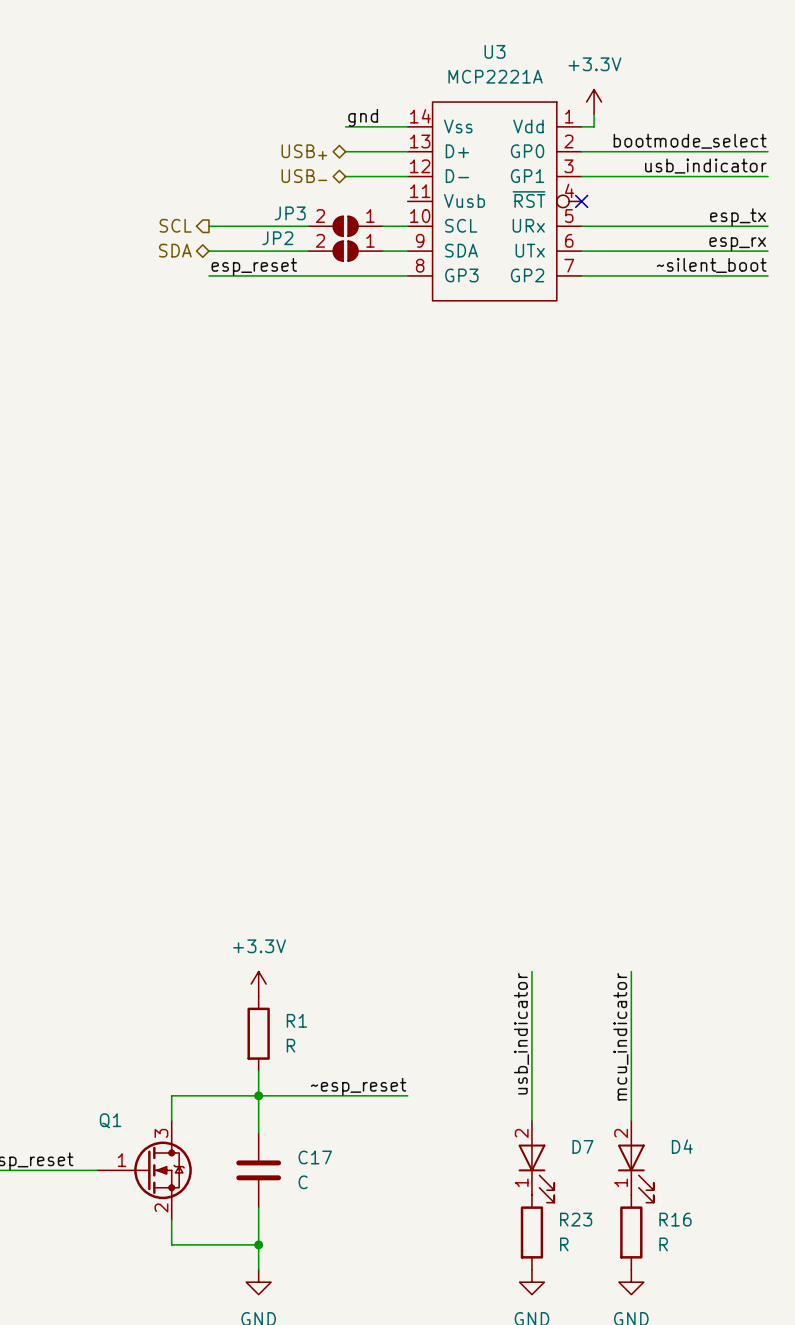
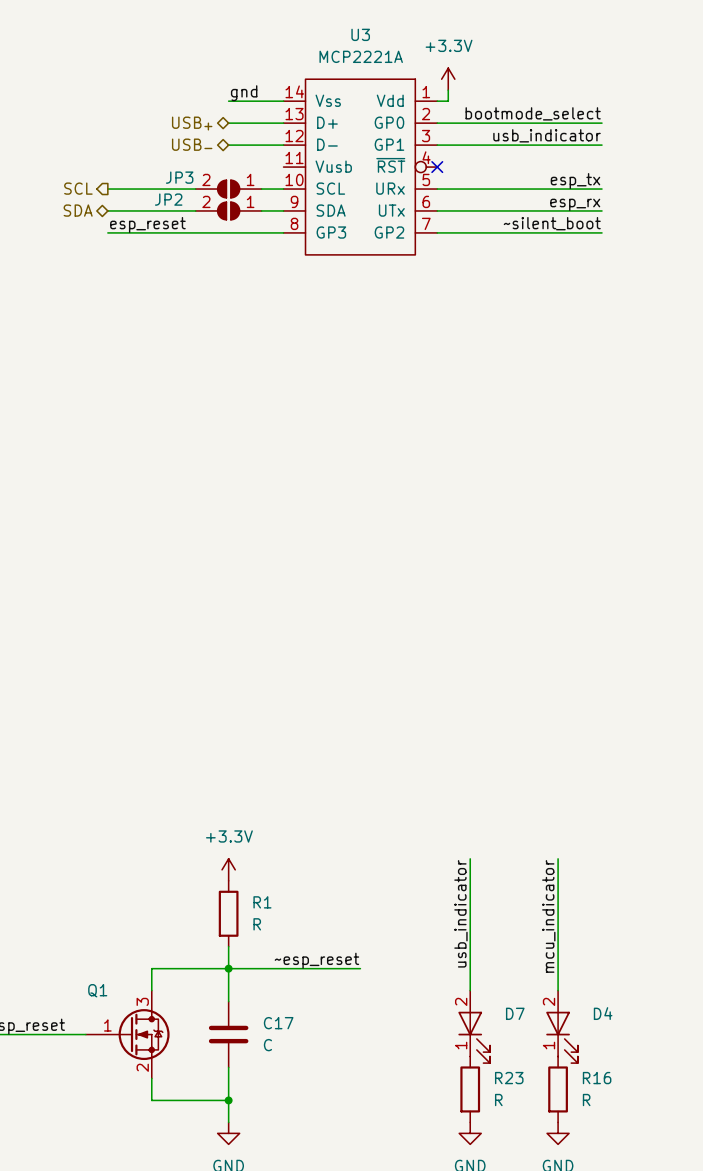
power symbol position: +3.3V (594, 102) -> +3.3V (448, 79)
wire: (594, 114) (594, 126) (581, 126) -> (448, 90) (448, 101) (437, 101)
label position: gnd (363, 117) -> gnd (244, 93)
wire: (345, 126) (407, 126) -> (228, 101) (283, 101)
label position: bootmode_select (690, 141) -> bootmode_select (533, 113)
wire: (345, 151) (407, 151) -> (228, 123) (283, 123)
wire: (581, 151) (767, 151) -> (437, 123) (601, 123)
hierarchical label position: USB+ (304, 152) -> USB+ (192, 123)
label position: usb_indicator (705, 166) -> usb_indicator (547, 135)
hierarchical label position: USB- (304, 176) -> USB- (192, 144)
wire: (345, 176) (407, 176) -> (228, 145) (283, 145)
wire: (581, 176) (767, 176) -> (437, 145) (601, 145)
no-connect mark: none -> (437, 167)
U3 position: (494, 201) -> (360, 167)
no-connect mark: (581, 201) -> none
label position: esp_tx (738, 217) -> esp_tx (575, 181)
hierarchical label position: SCL (175, 225) -> SCL (78, 188)
wire: (208, 226) (308, 226) -> (107, 189) (195, 189)
JP3 position: (345, 226) -> (228, 189)
wire: (382, 226) (407, 226) -> (261, 189) (283, 189)
wire: (581, 226) (767, 226) -> (437, 189) (601, 189)
label position: esp_rx (737, 244) -> esp_rx (575, 204)
hierarchical label position: SDA (175, 250) -> SDA (78, 210)
wire: (208, 251) (308, 251) -> (107, 210) (195, 210)
JP2 position: (345, 251) -> (228, 210)
wire: (382, 251) (407, 251) -> (261, 210) (283, 210)
wire: (581, 251) (767, 251) -> (437, 210) (601, 210)
label position: ~silent_boot (711, 265) -> ~silent_boot (552, 223)
label position: esp_reset (254, 266) -> esp_reset (147, 224)
wire: (208, 275) (407, 275) -> (107, 232) (283, 232)
wire: (581, 275) (767, 275) -> (437, 232) (601, 232)

